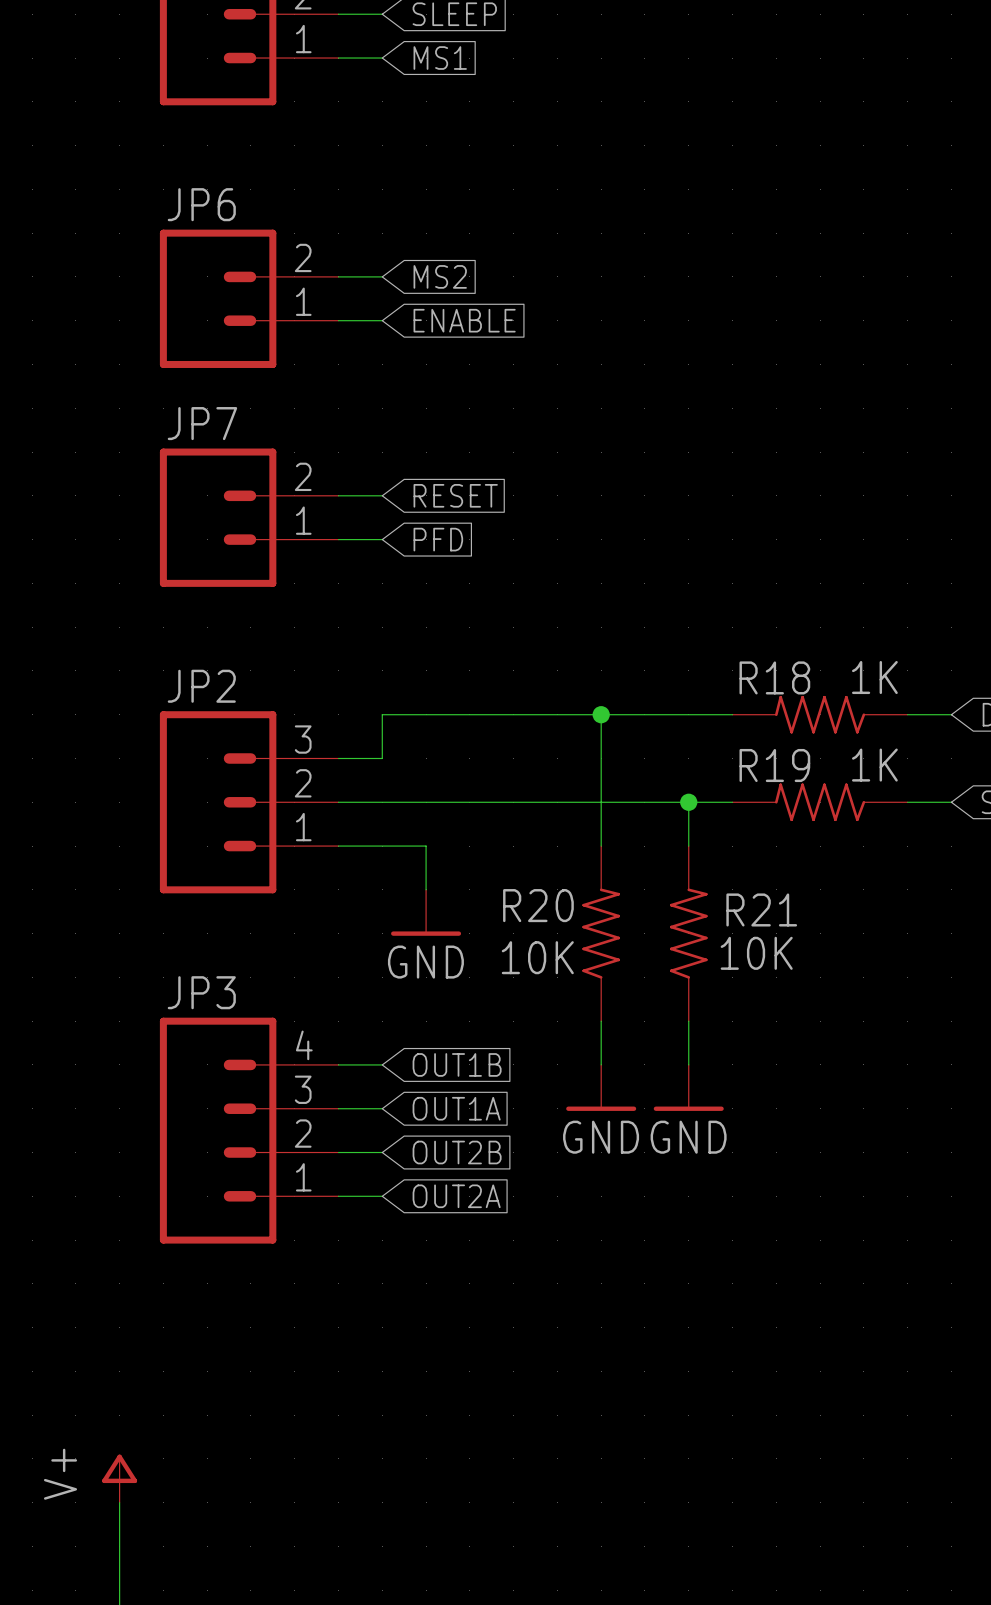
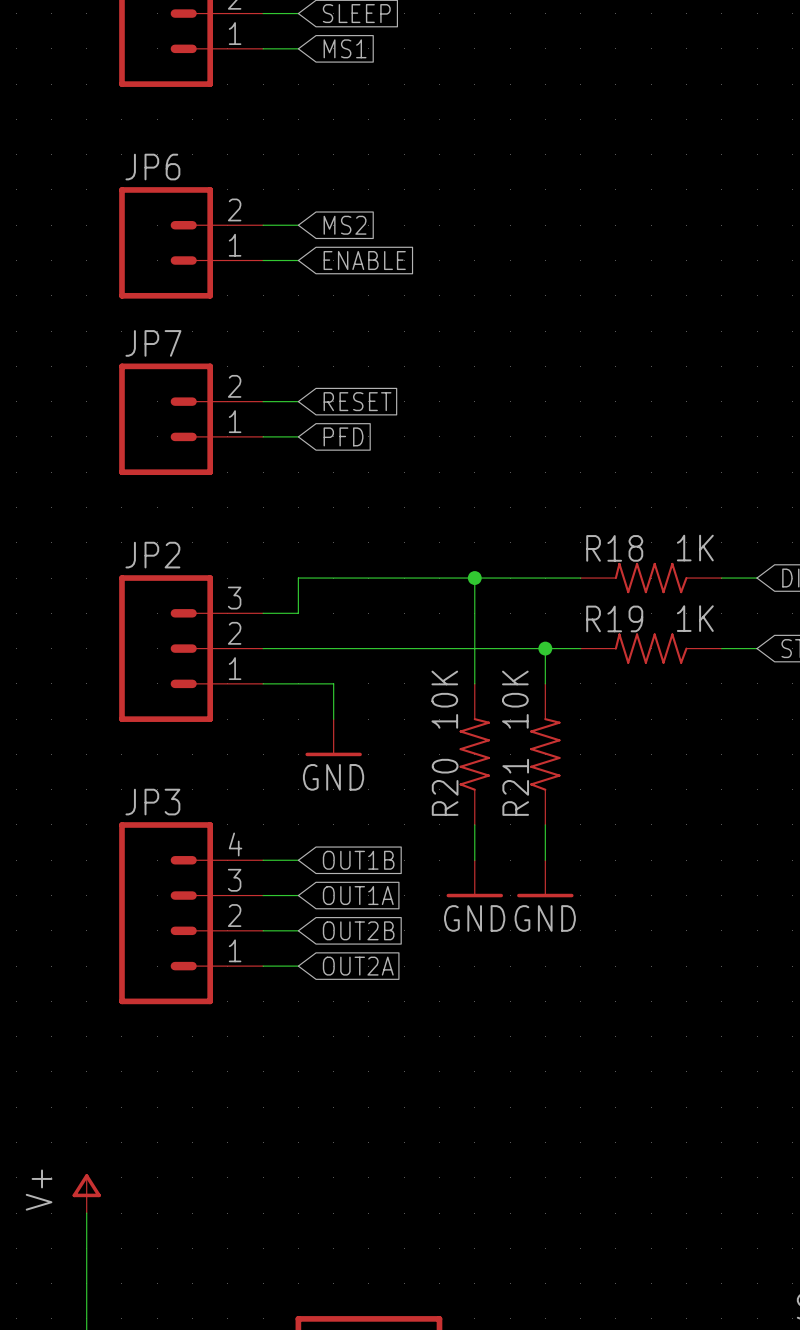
R20 name rotation: 0° (538, 905) -> 90° counterclockwise (445, 787)
R21 name rotation: 0° (761, 909) -> 90° counterclockwise (515, 787)
R21 name position: R21 (761, 909) -> R21 (515, 787)
R21 value rotation: 0° (756, 953) -> 90° counterclockwise (515, 699)
R21 value position: 10K (756, 953) -> 10K (515, 699)
R20 value rotation: 0° (537, 957) -> 90° counterclockwise (444, 699)
R20 value position: 10K (537, 957) -> 10K (444, 699)

